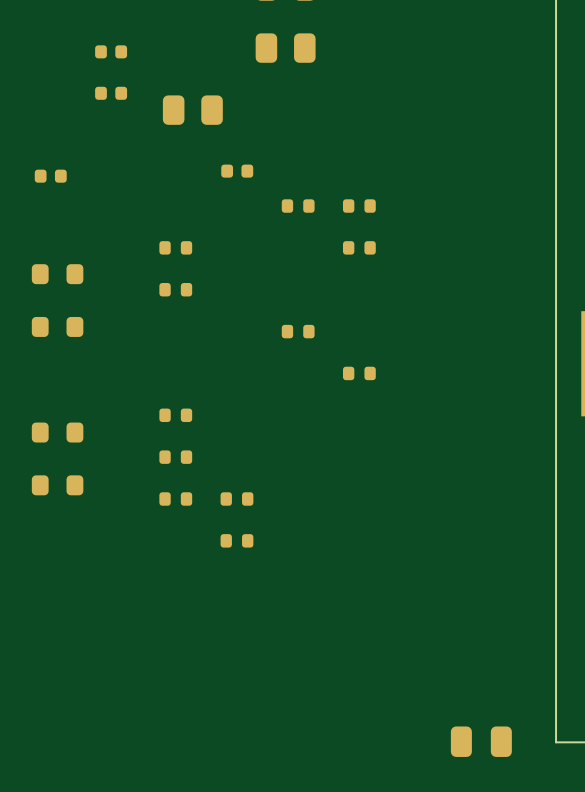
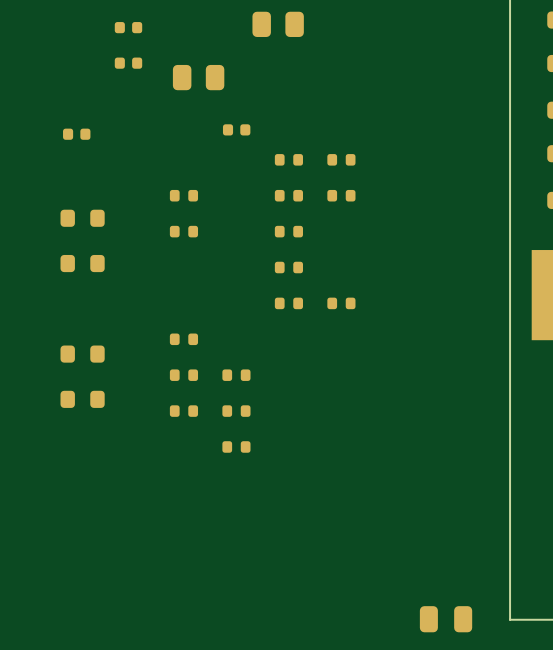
part: none -> (288, 195)
part: none -> (288, 231)
part: none -> (288, 303)
part: none -> (236, 375)

